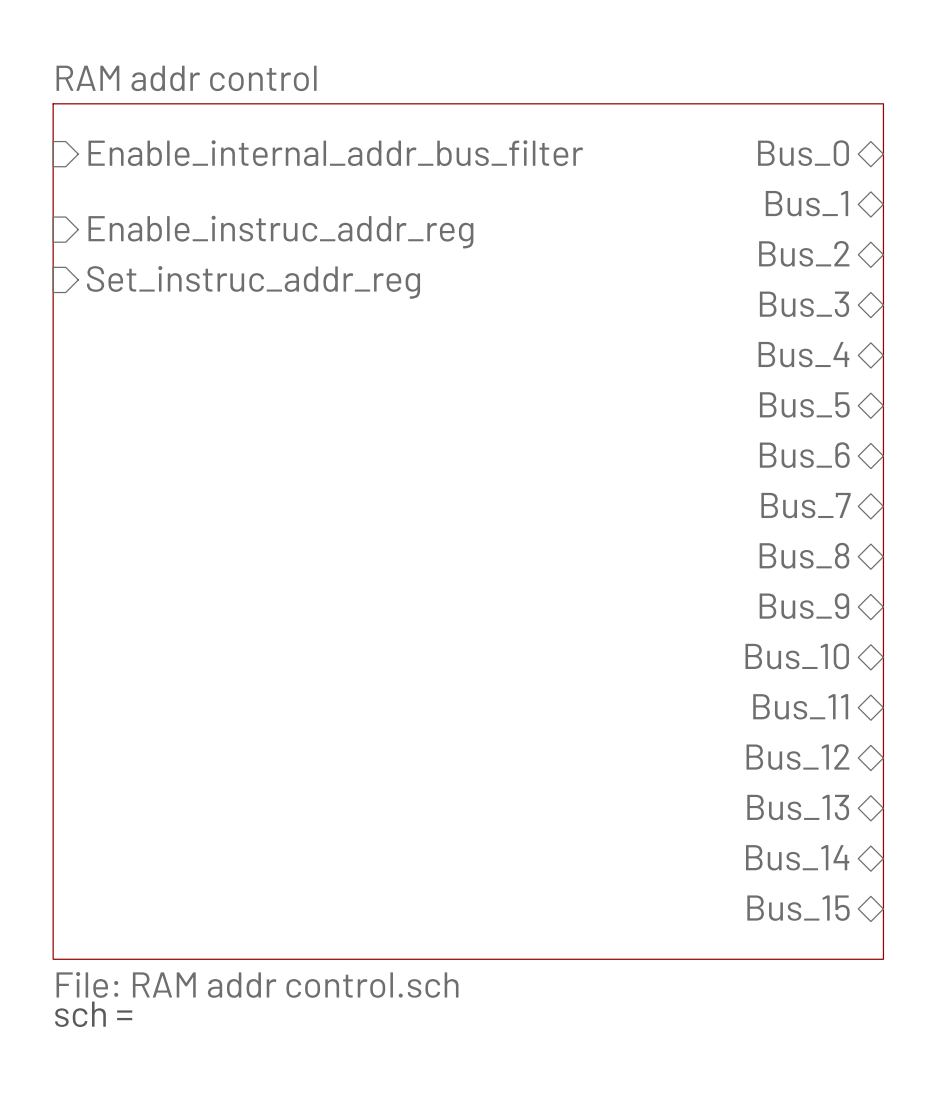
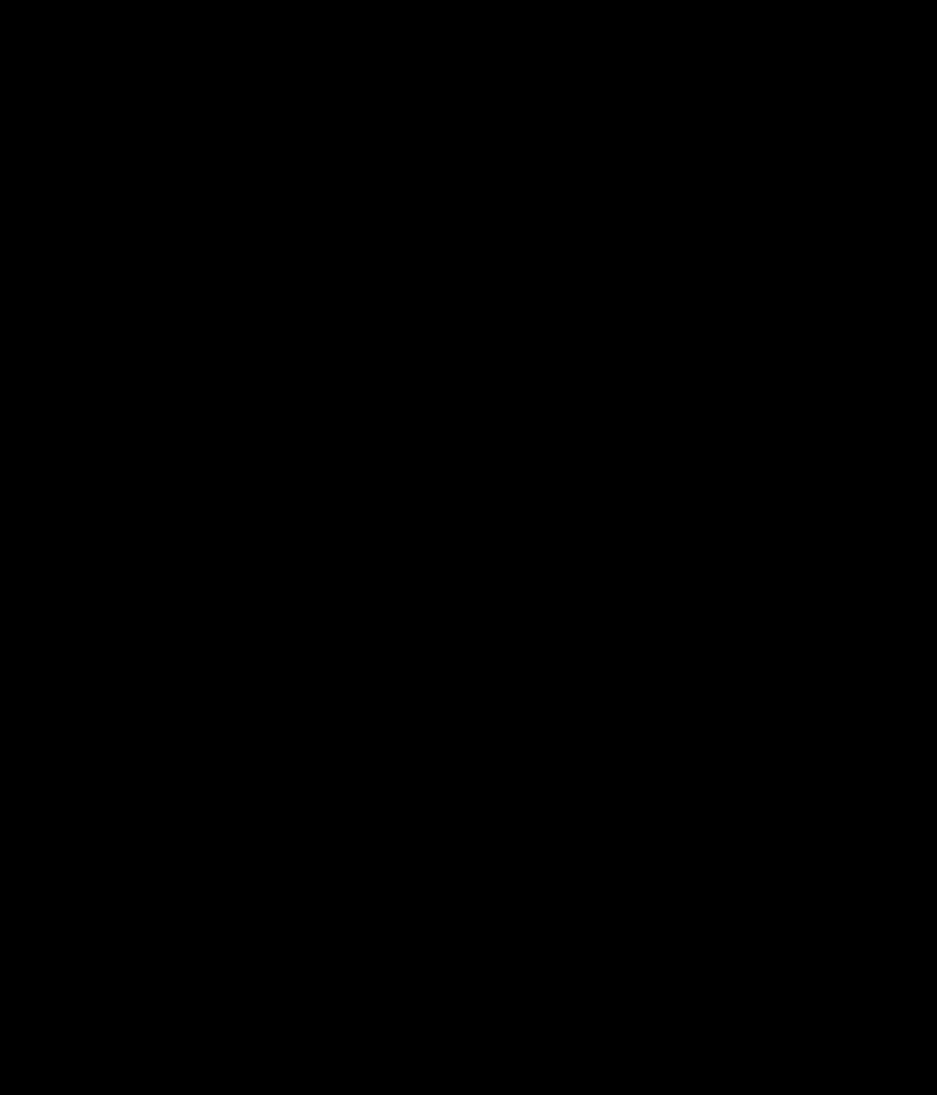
sheet pin: Enable_internal_addr_bus_filter (335, 153) -> none
sheet pin: Bus_0 (803, 153) -> none
sheet pin: Bus_1 (806, 203) -> none
sheet pin: Enable_instruc_addr_reg (280, 232) -> none
sheet pin: Bus_2 (804, 253) -> none
sheet pin: Set_instruc_addr_reg (253, 282) -> none
sheet pin: Bus_3 (804, 304) -> none
sheet pin: Bus_4 (803, 354) -> none
sheet pin: Bus_5 (804, 404) -> none
sheet pin: Bus_6 (804, 455) -> none
sheet pin: Bus_7 (806, 505) -> none
sheet RAM addr control: File: RAM addr control.sch (468, 531) -> none
sheet pin: Bus_8 (804, 555) -> none
sheet pin: Bus_9 (804, 606) -> none
sheet pin: Bus_10 (797, 656) -> none
sheet pin: Bus_11 (800, 706) -> none
sheet pin: Bus_12 (797, 757) -> none
sheet pin: Bus_13 (798, 807) -> none
sheet pin: Bus_14 (797, 857) -> none
sheet pin: Bus_15 (798, 908) -> none
text: sch = (93, 1014) -> none

